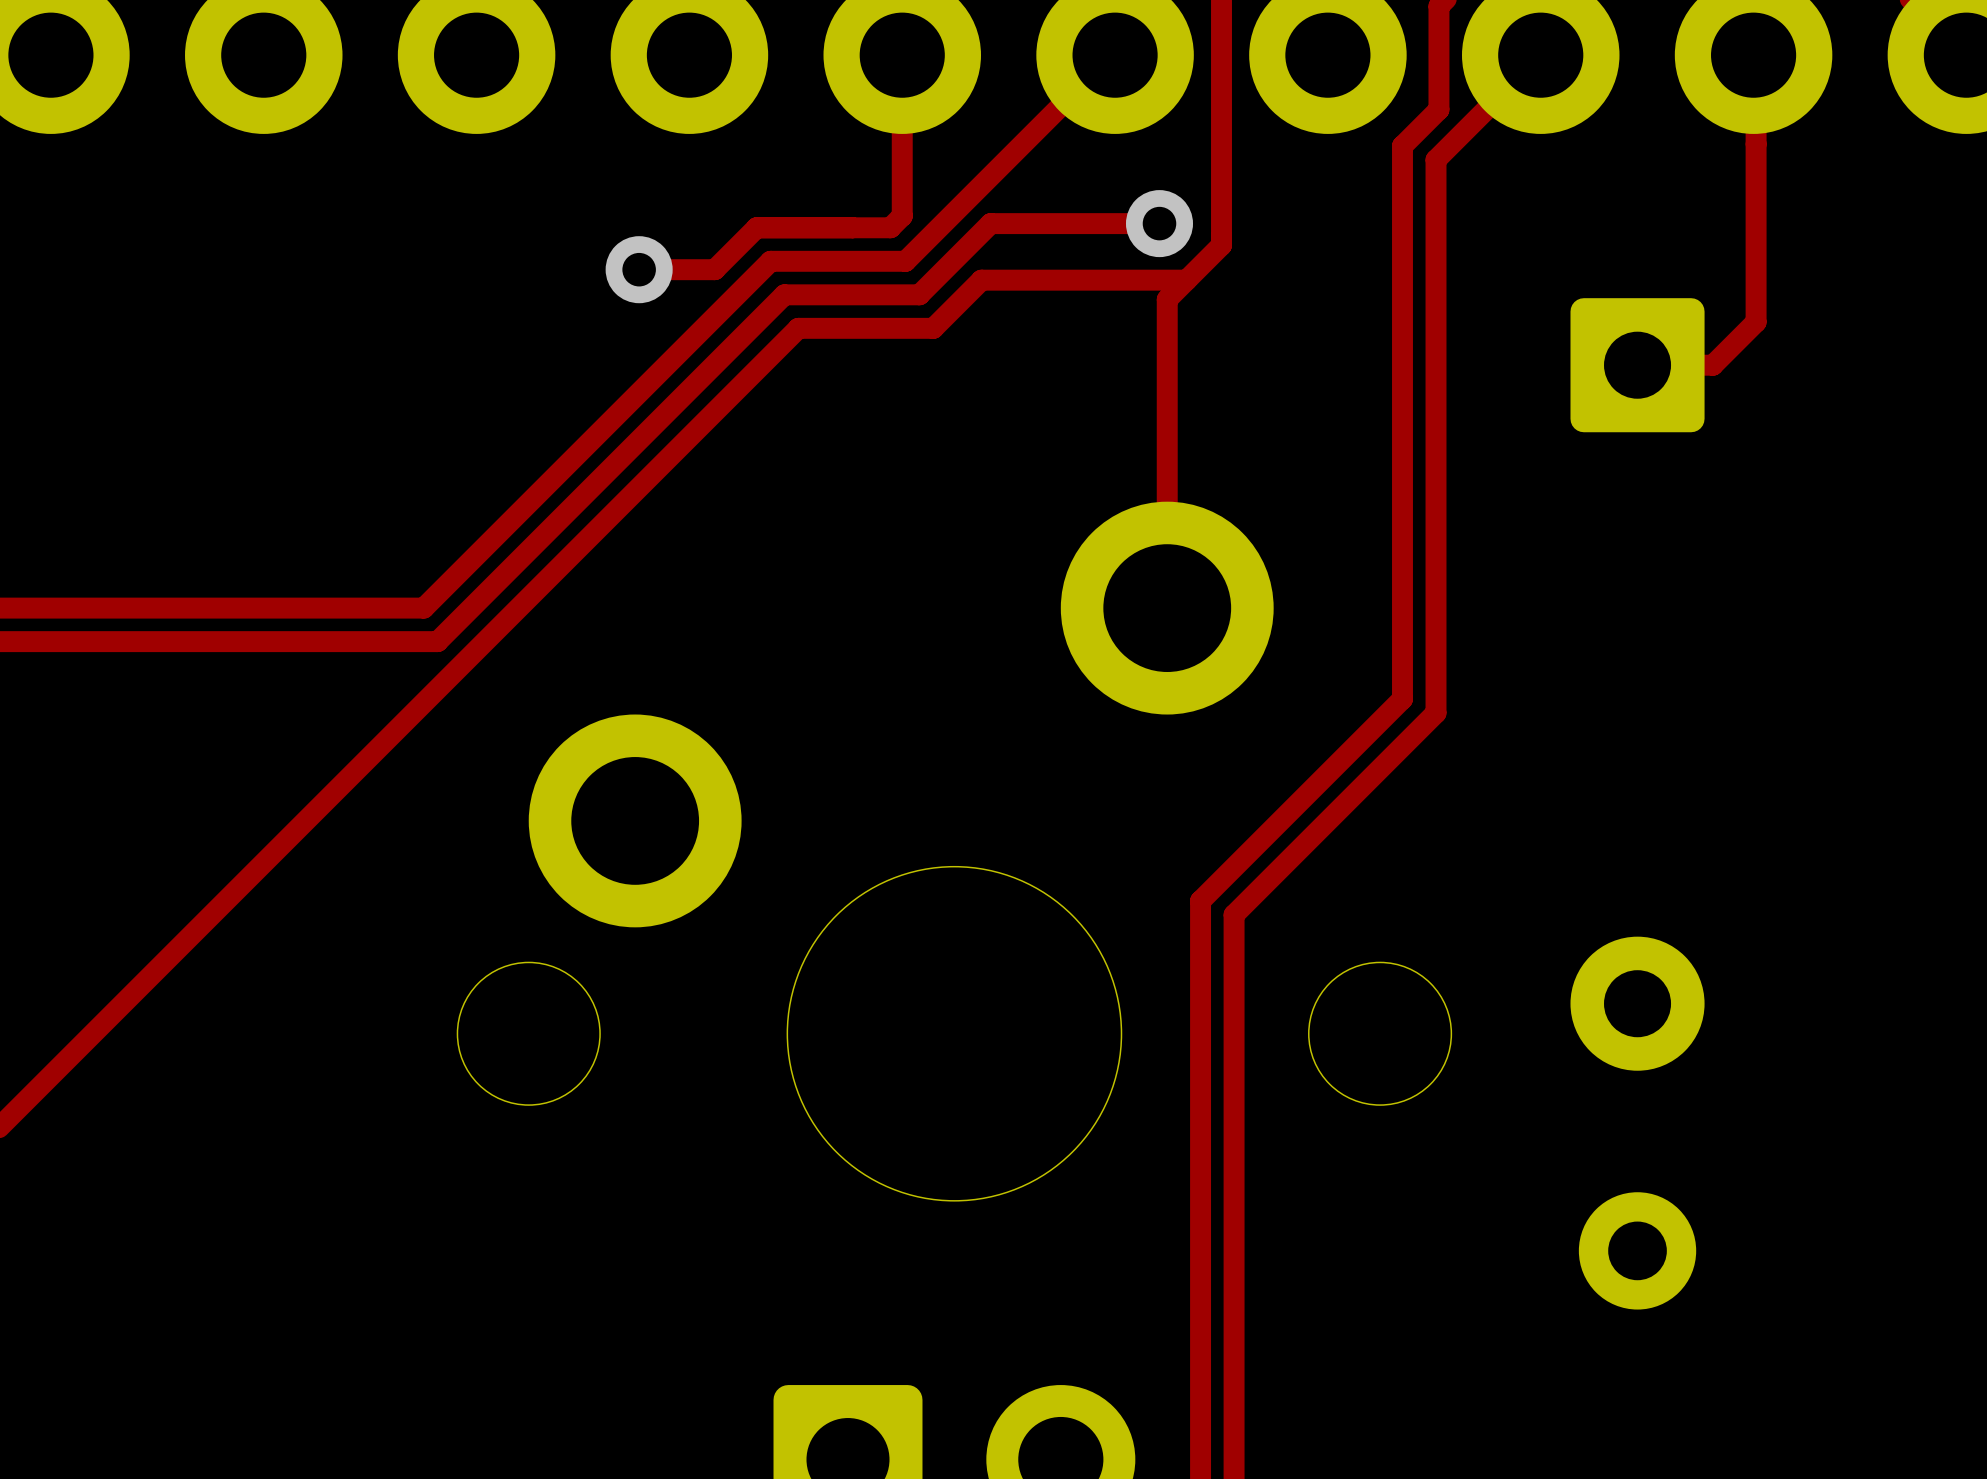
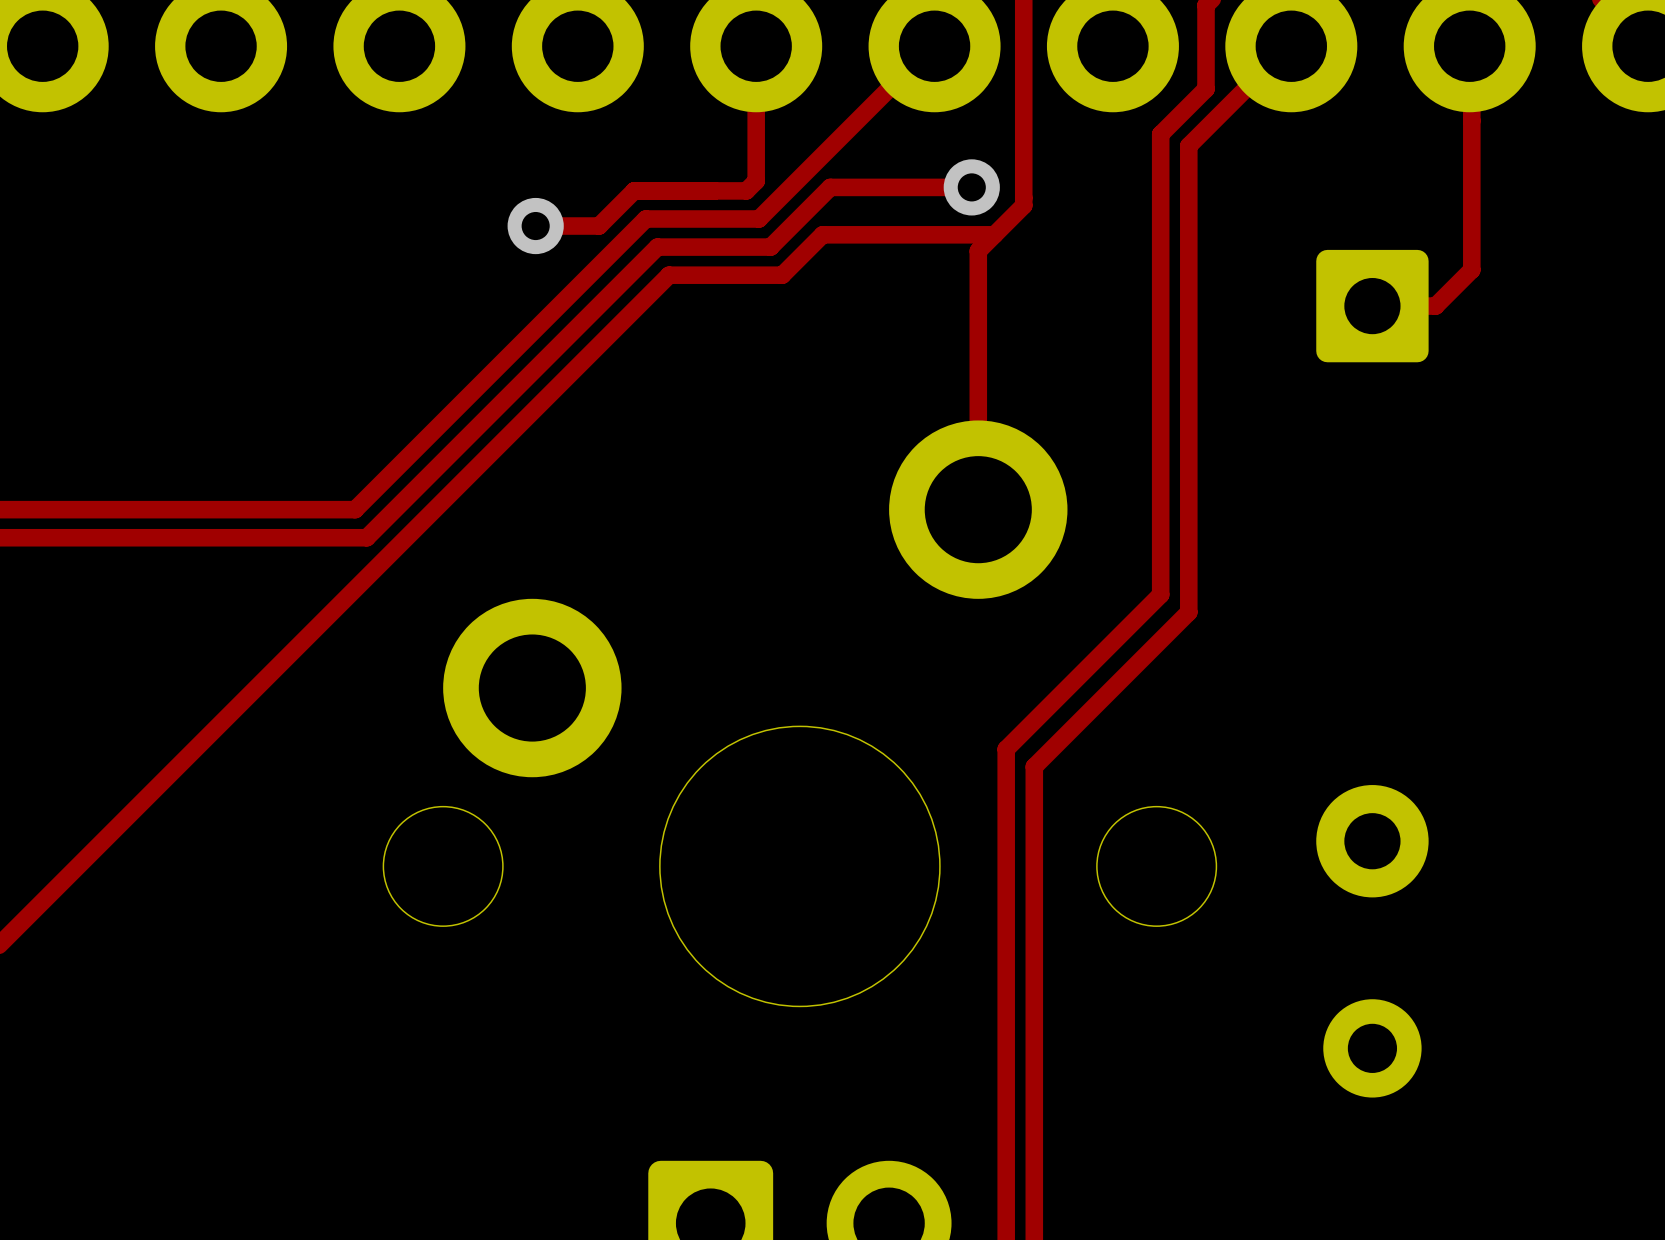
track: (1540, 55) (1436, 159) (1436, 712) (1418, 730) -> (1293, 41) (1188, 145) (1188, 612)
track: (1438, 106) (1438, 109) (1402, 146) (1402, 699) (1200, 901) -> (1206, 89) (1160, 134) (1160, 594) (1006, 749) (1006, 755)

